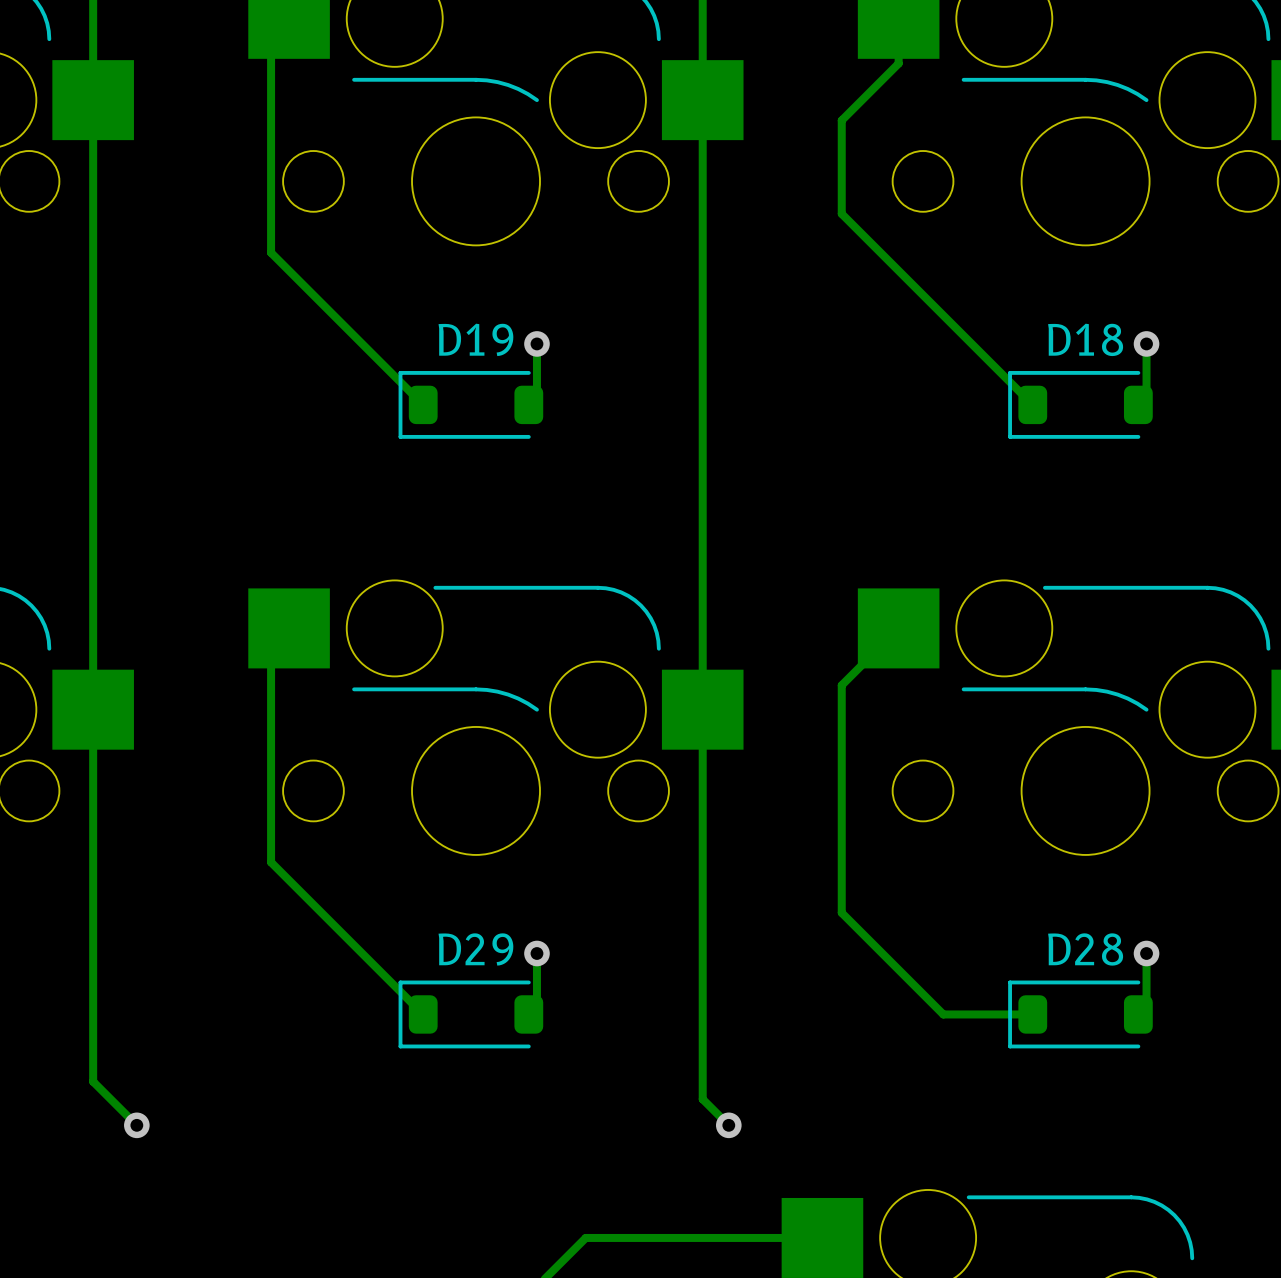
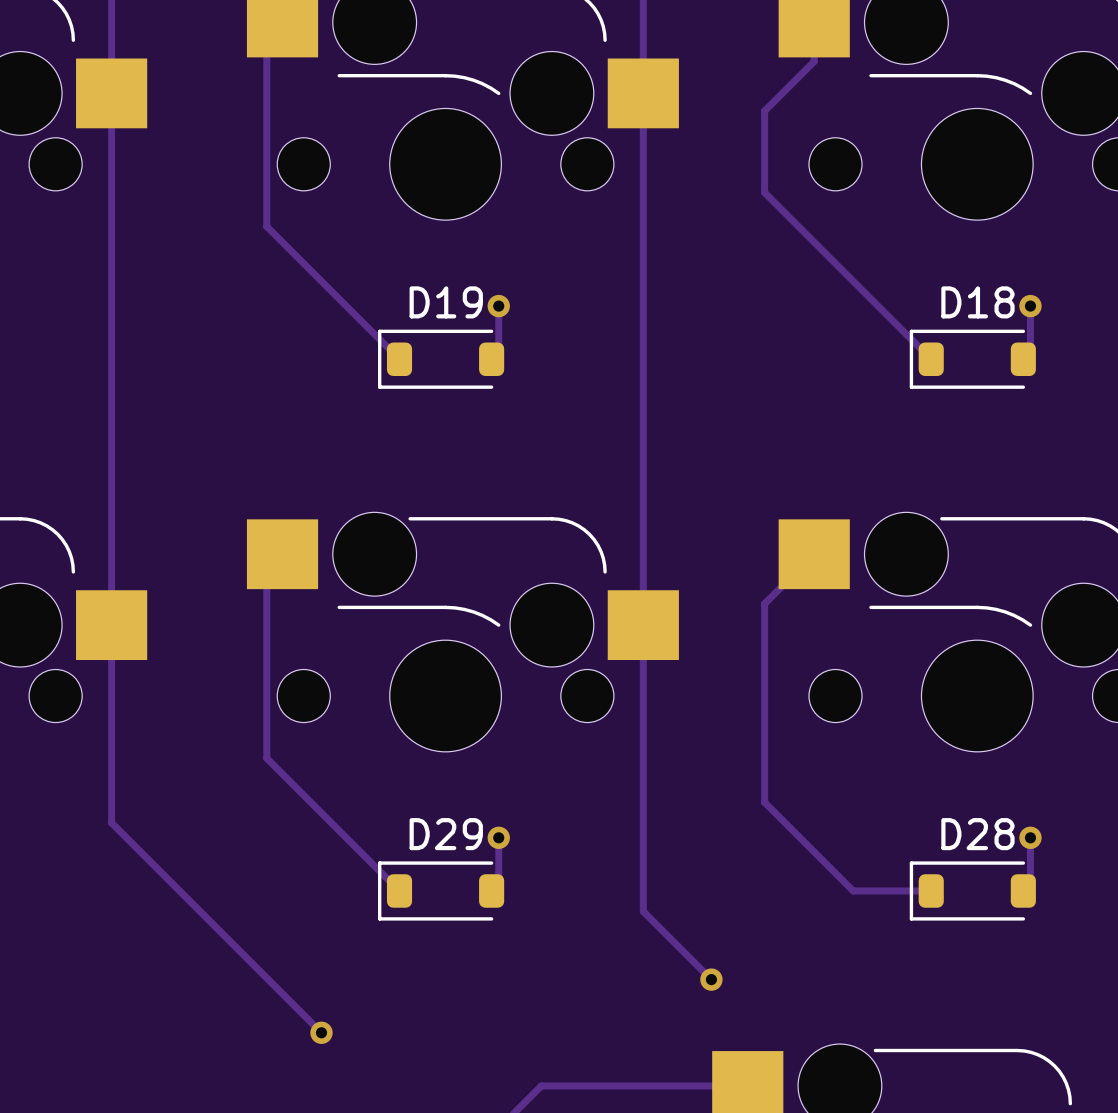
track: (93, 936) (93, 1081) (136, 1125) -> (111, 822) (321, 1032)
track: (702, 1037) (702, 1099) (728, 1125) -> (643, 911) (711, 979)
via: (136, 1125) -> none
via position: (728, 1125) -> (711, 979)
via: none -> (321, 1032)

